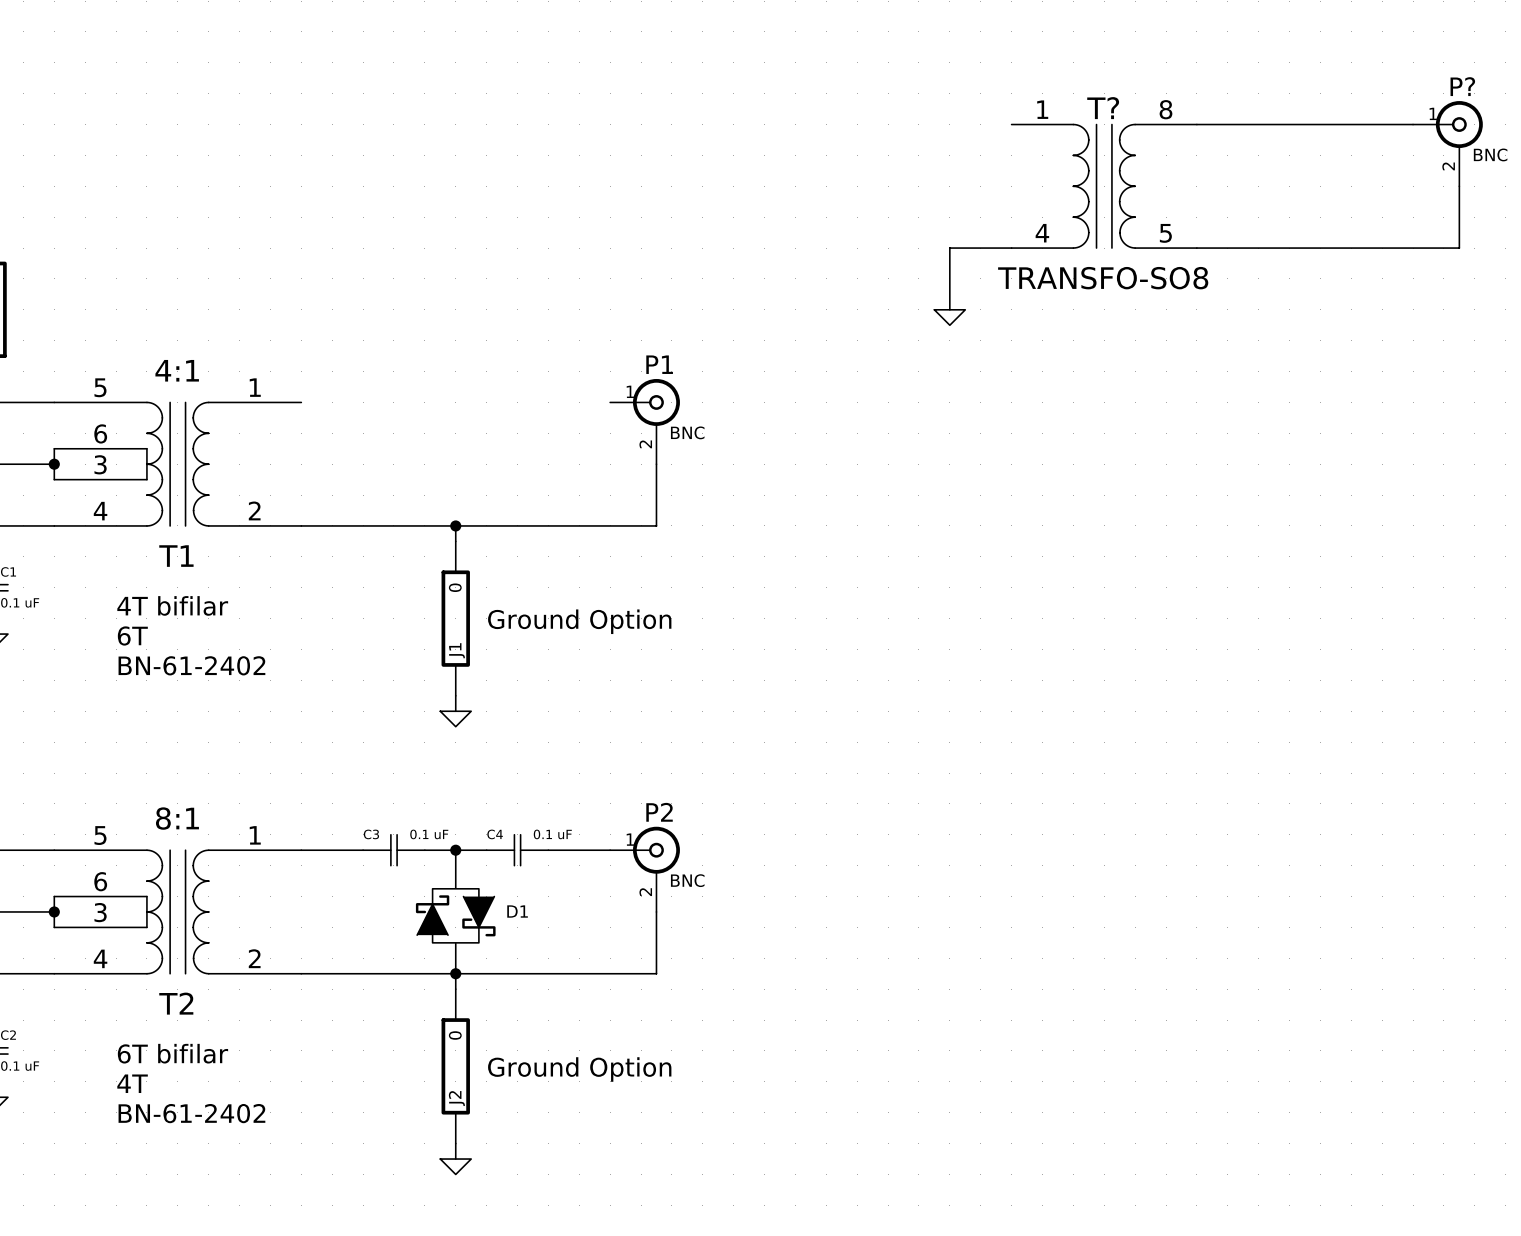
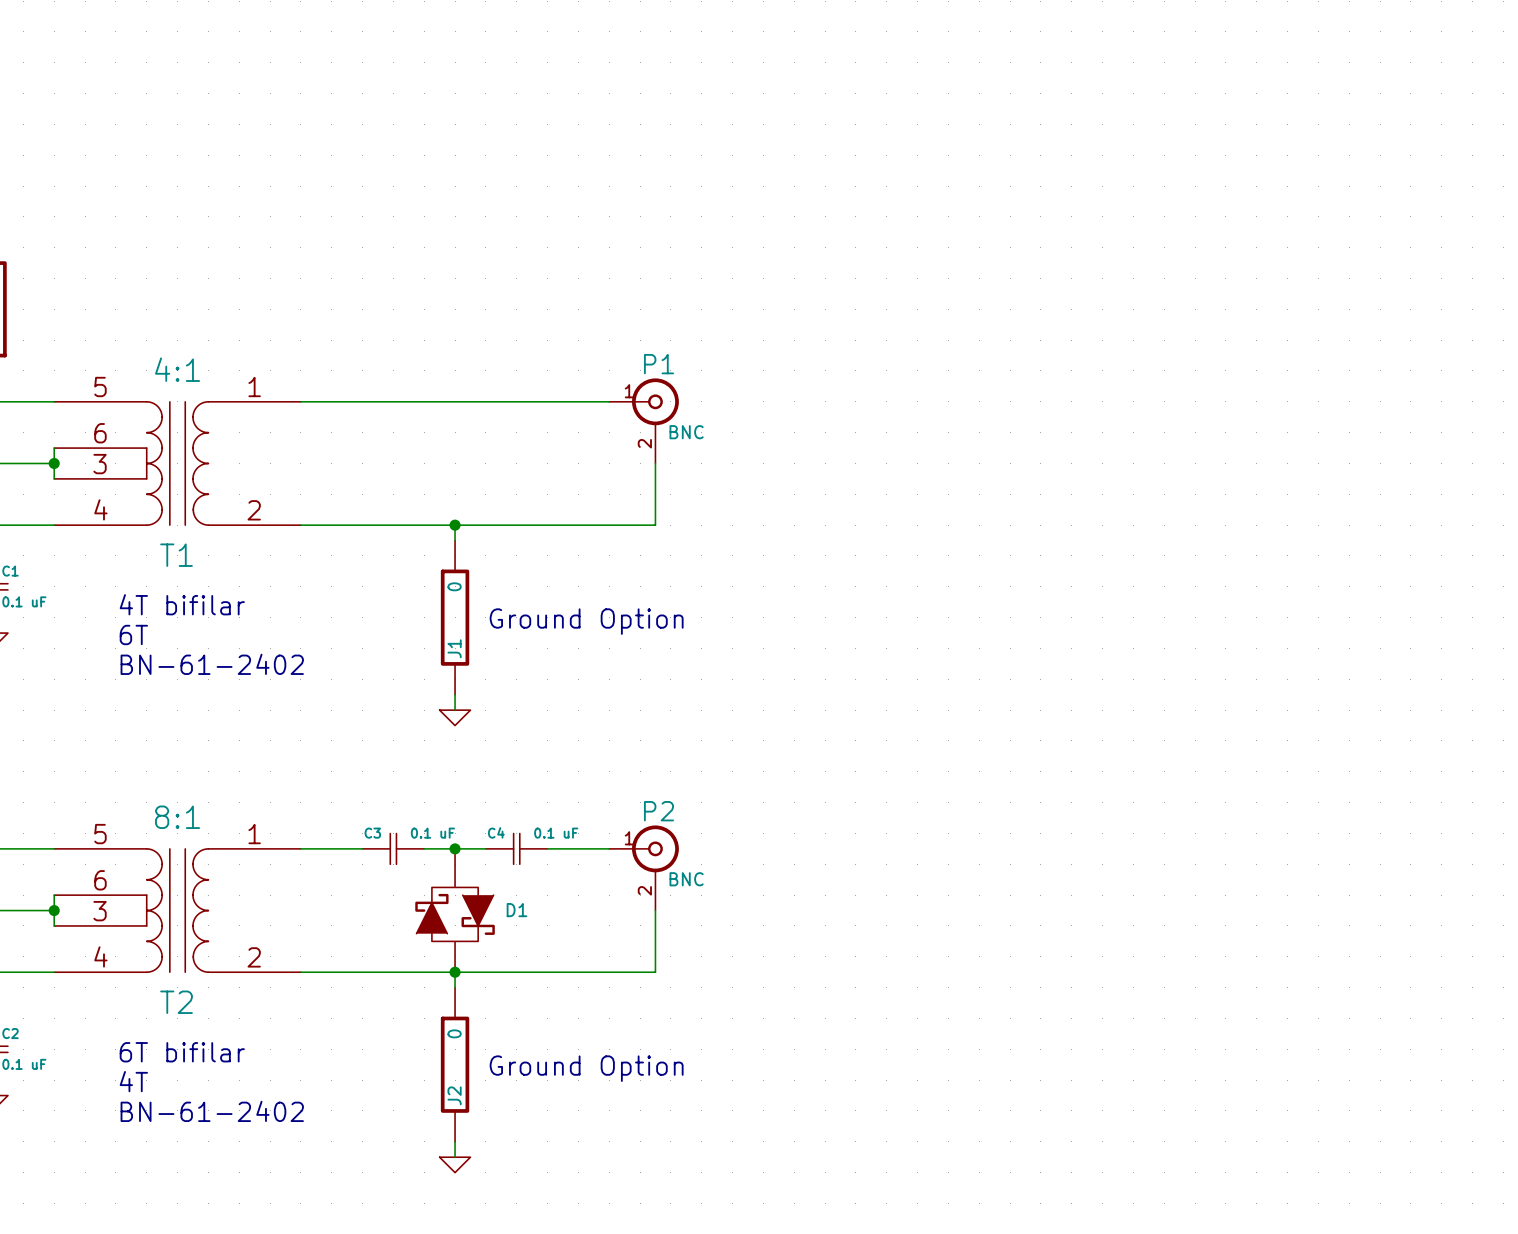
wire: (1196, 124) (1413, 124) -> none
P?: BNC (1447, 143) -> none
T?: TRANSFO-SO8 (1104, 186) -> none
wire: (1459, 186) (1459, 248) (1196, 248) -> none
wire: (1011, 248) (949, 248) (949, 309) -> none
power symbol: (949, 317) -> none
wire: none -> (300, 401) (609, 401)

